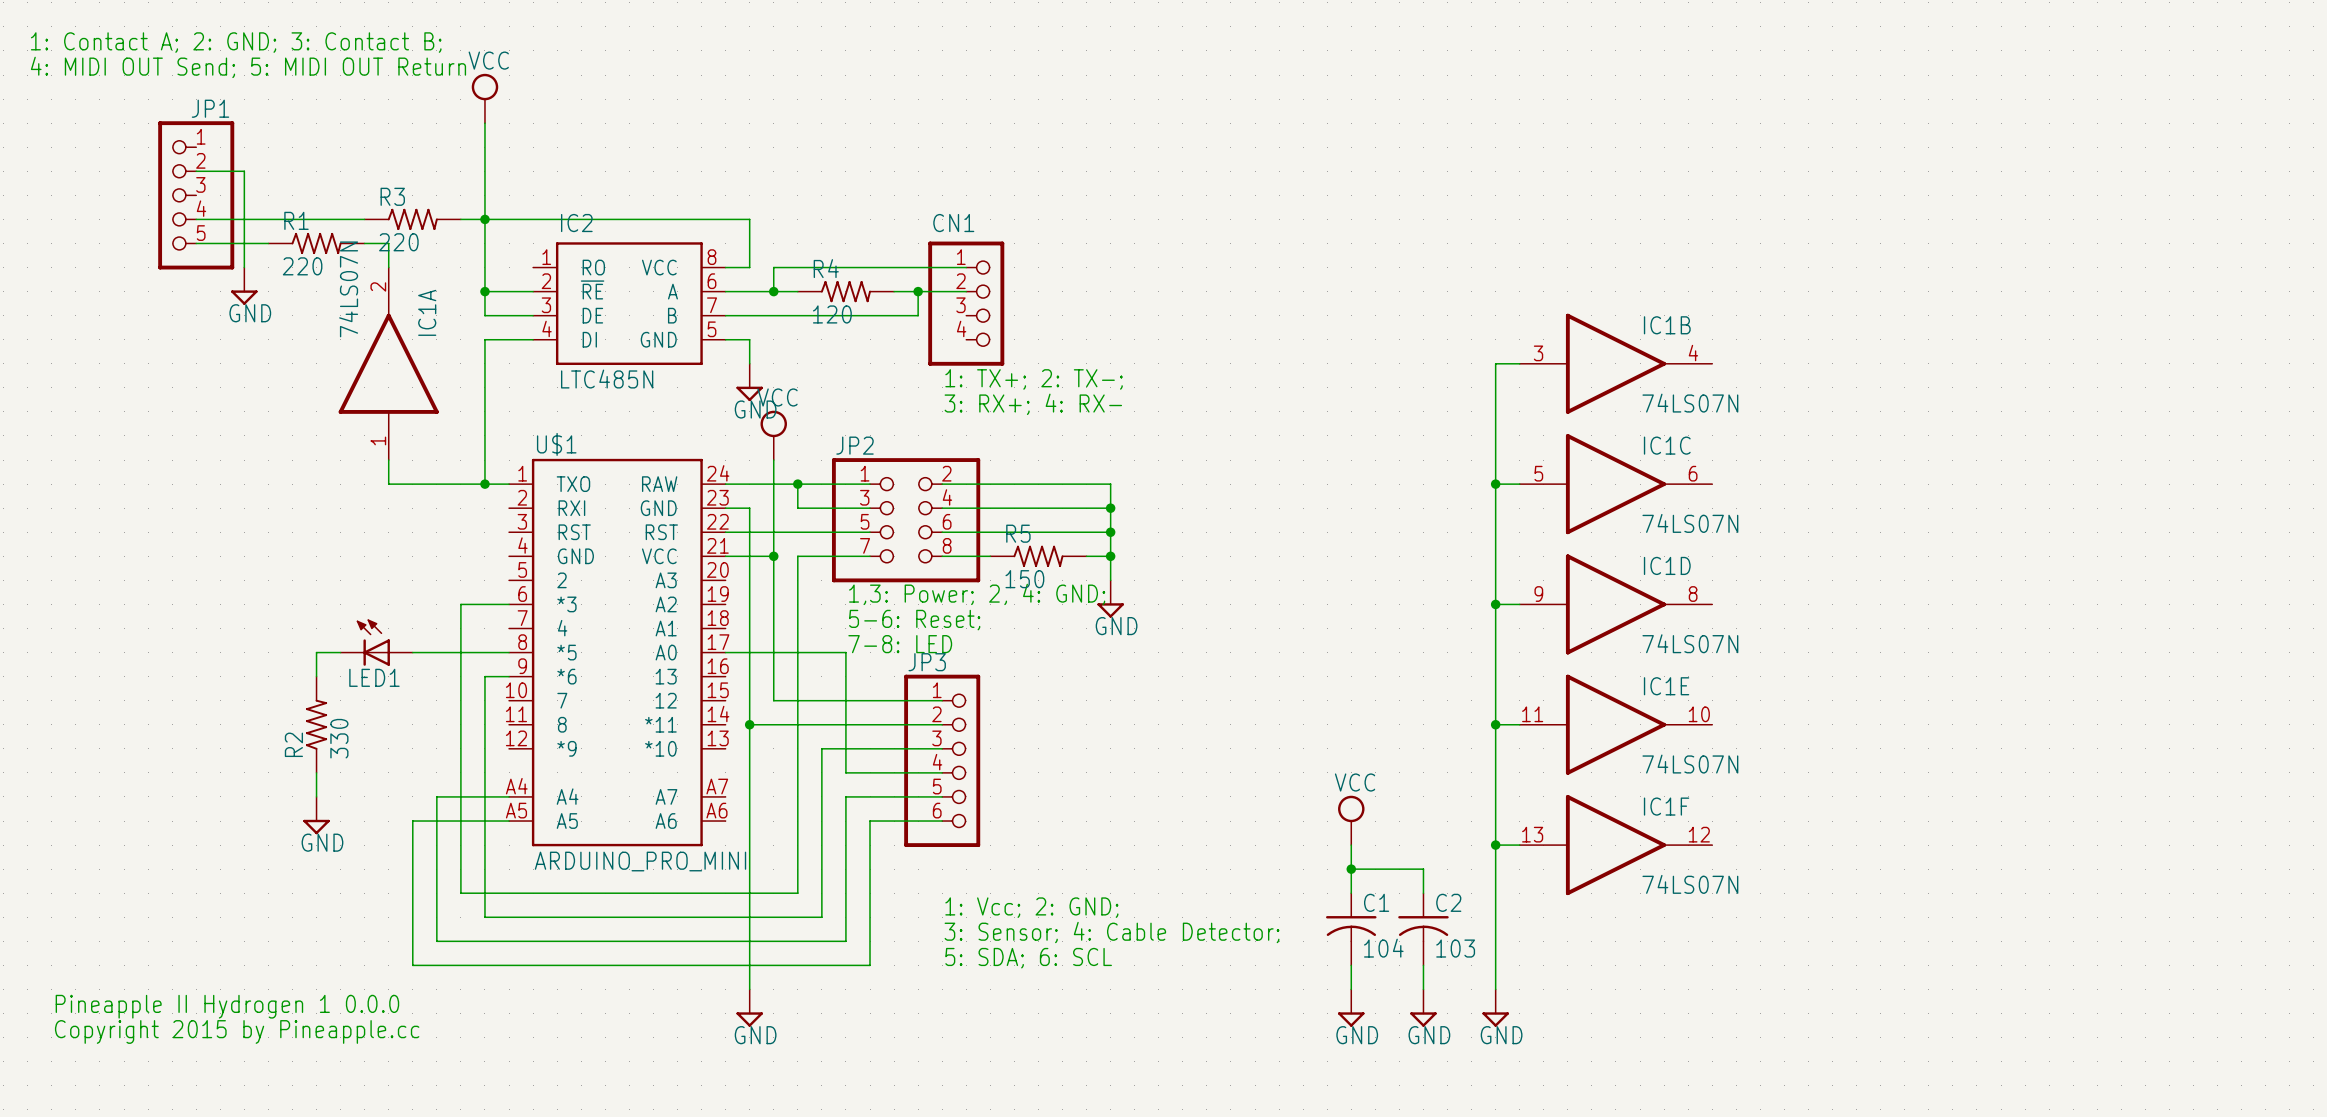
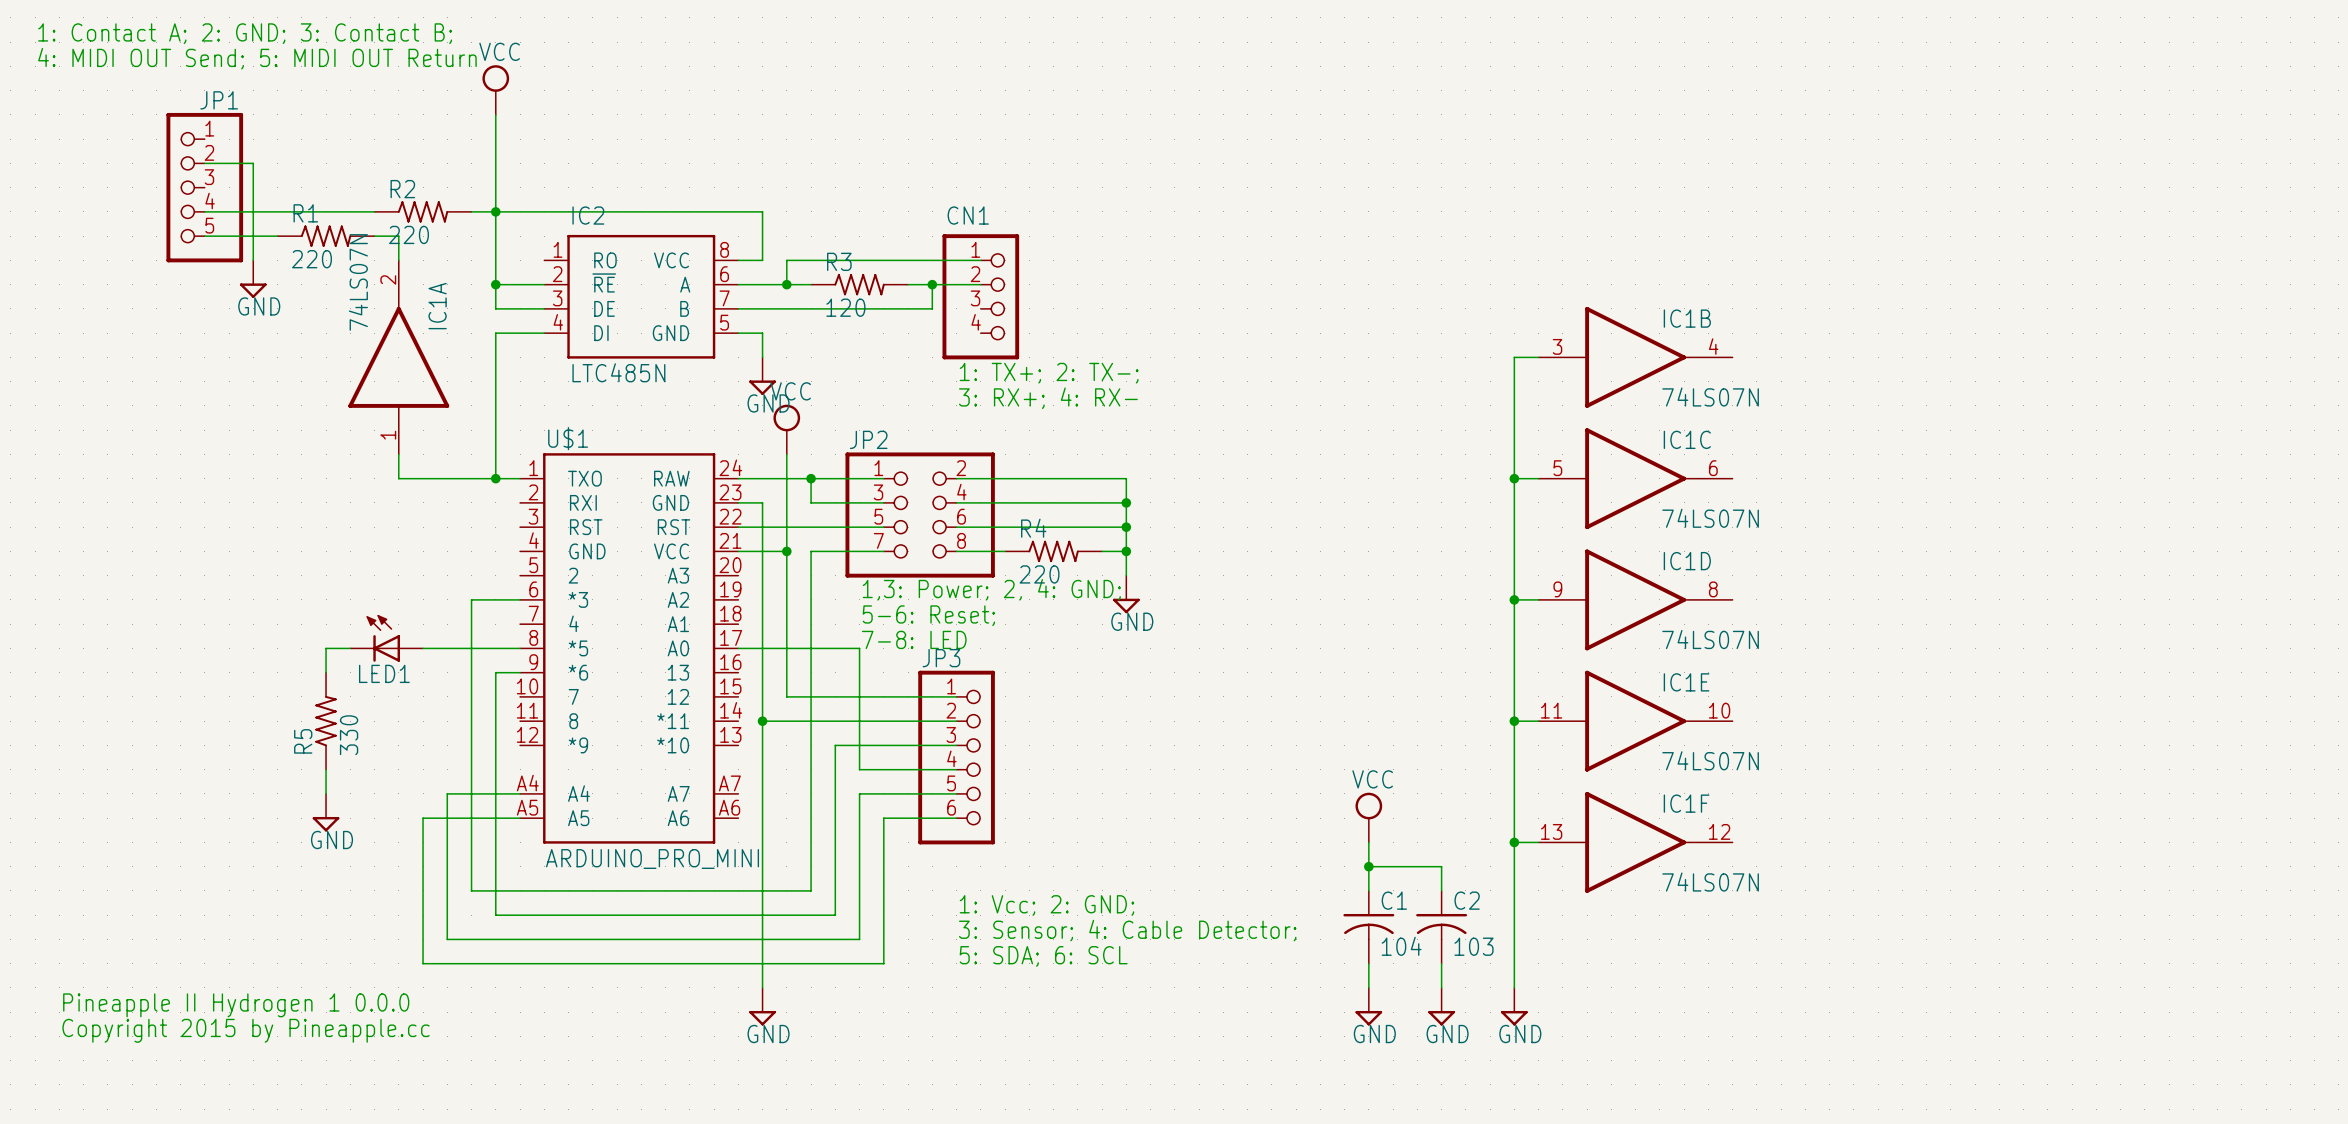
R3 name: R3 (392, 196) -> R2 (402, 189)
R4 name: R4 (826, 268) -> R3 (839, 261)
R5 name: R5 (1018, 533) -> R4 (1033, 528)
R5 value: 150 (1024, 579) -> 220 (1039, 574)
R2 name: R2 (293, 744) -> R5 (303, 741)

